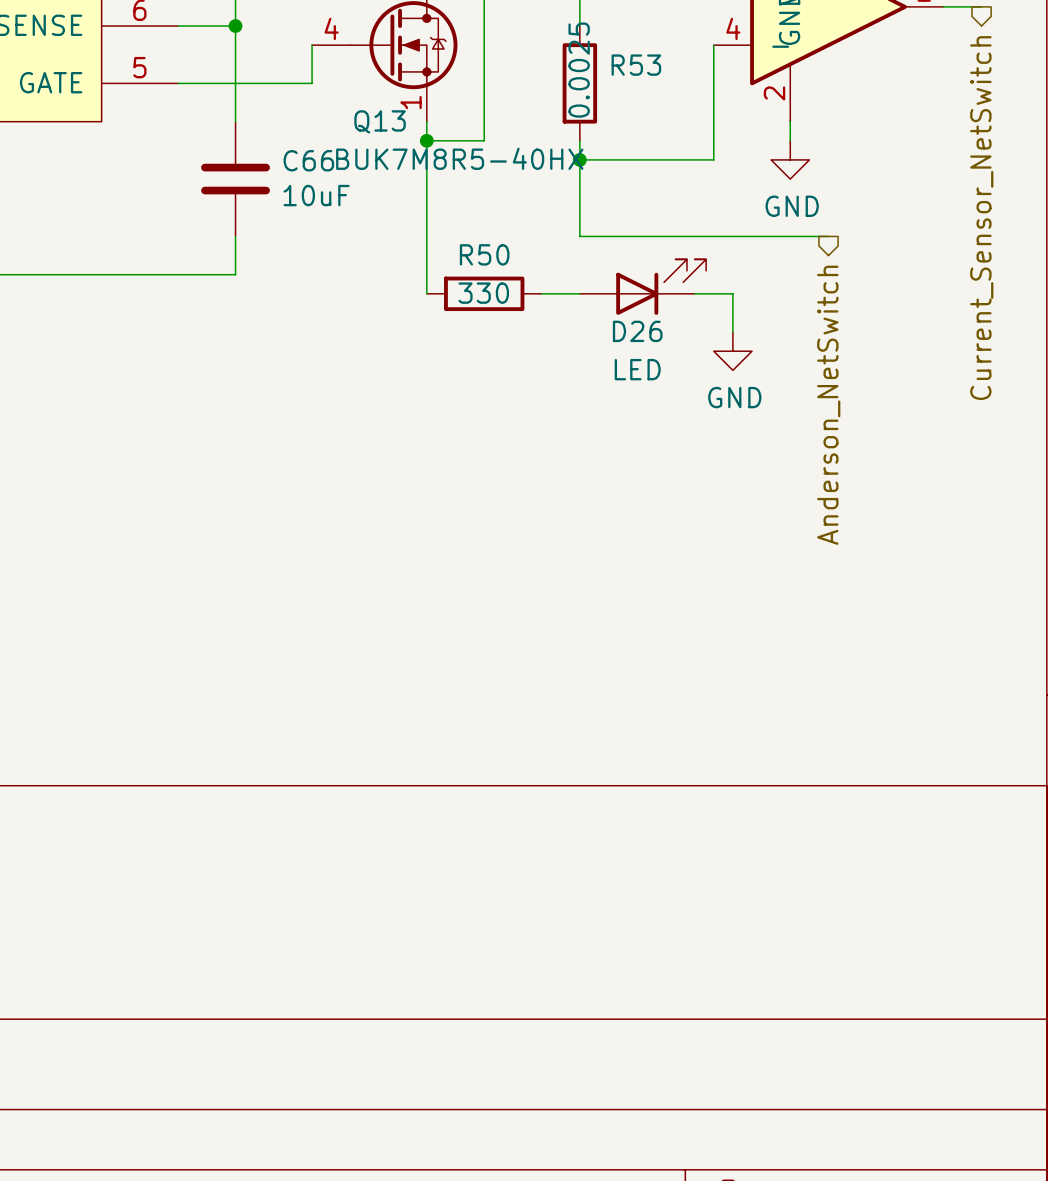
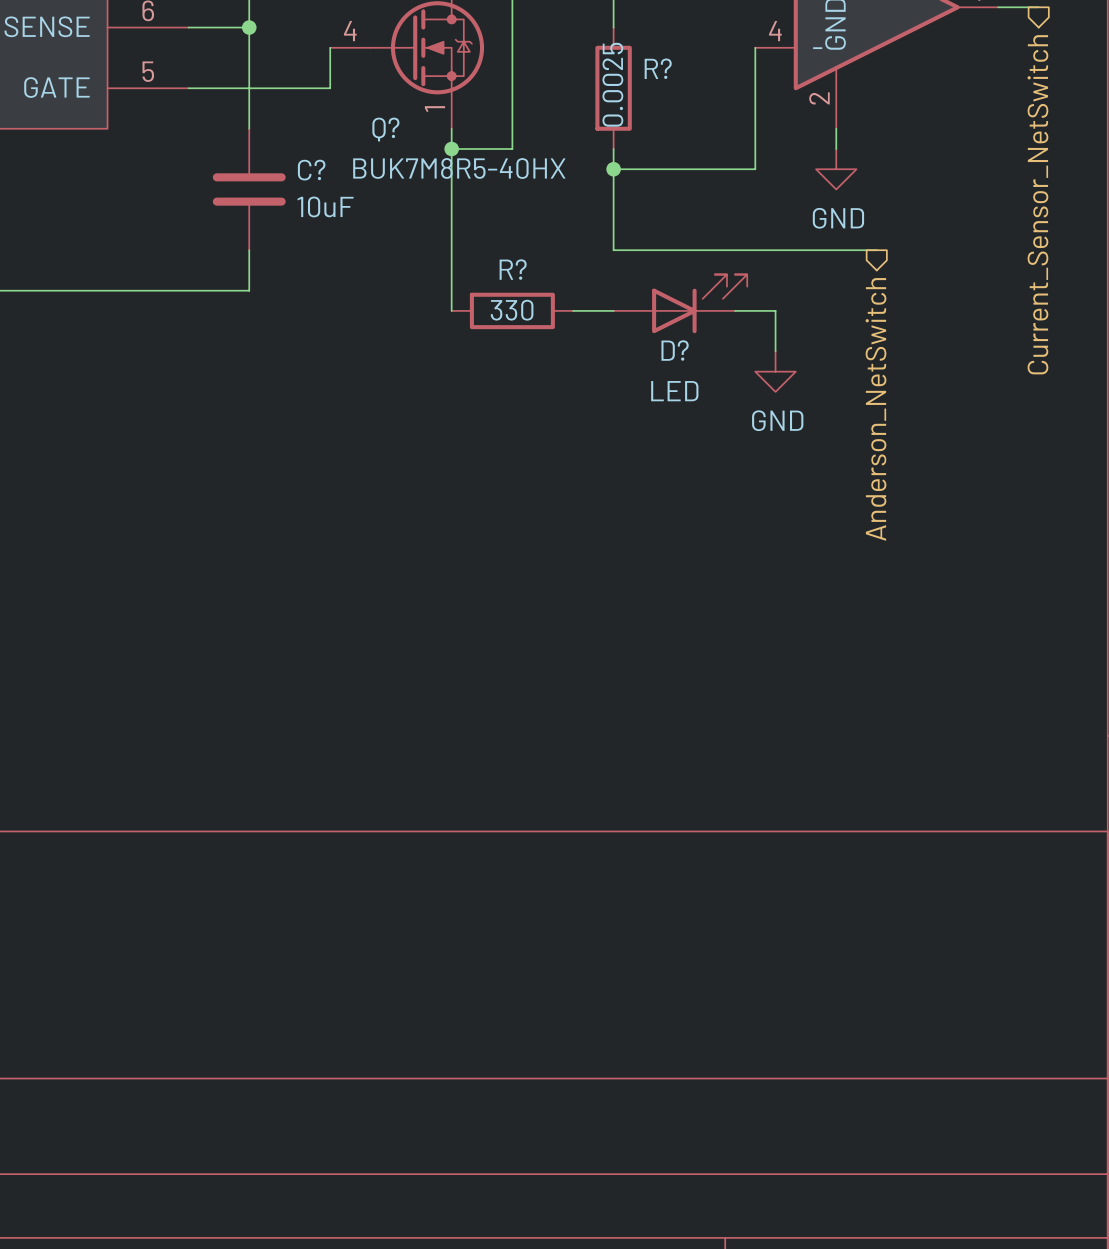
R53 name: R53 (636, 65) -> R? (658, 68)
Q13 name: Q13 (380, 121) -> Q? (385, 129)
C66 name: C66 (308, 160) -> C? (311, 170)
R50 name: R50 (484, 254) -> R? (513, 269)
D26 name: D26 (637, 331) -> D? (675, 350)

